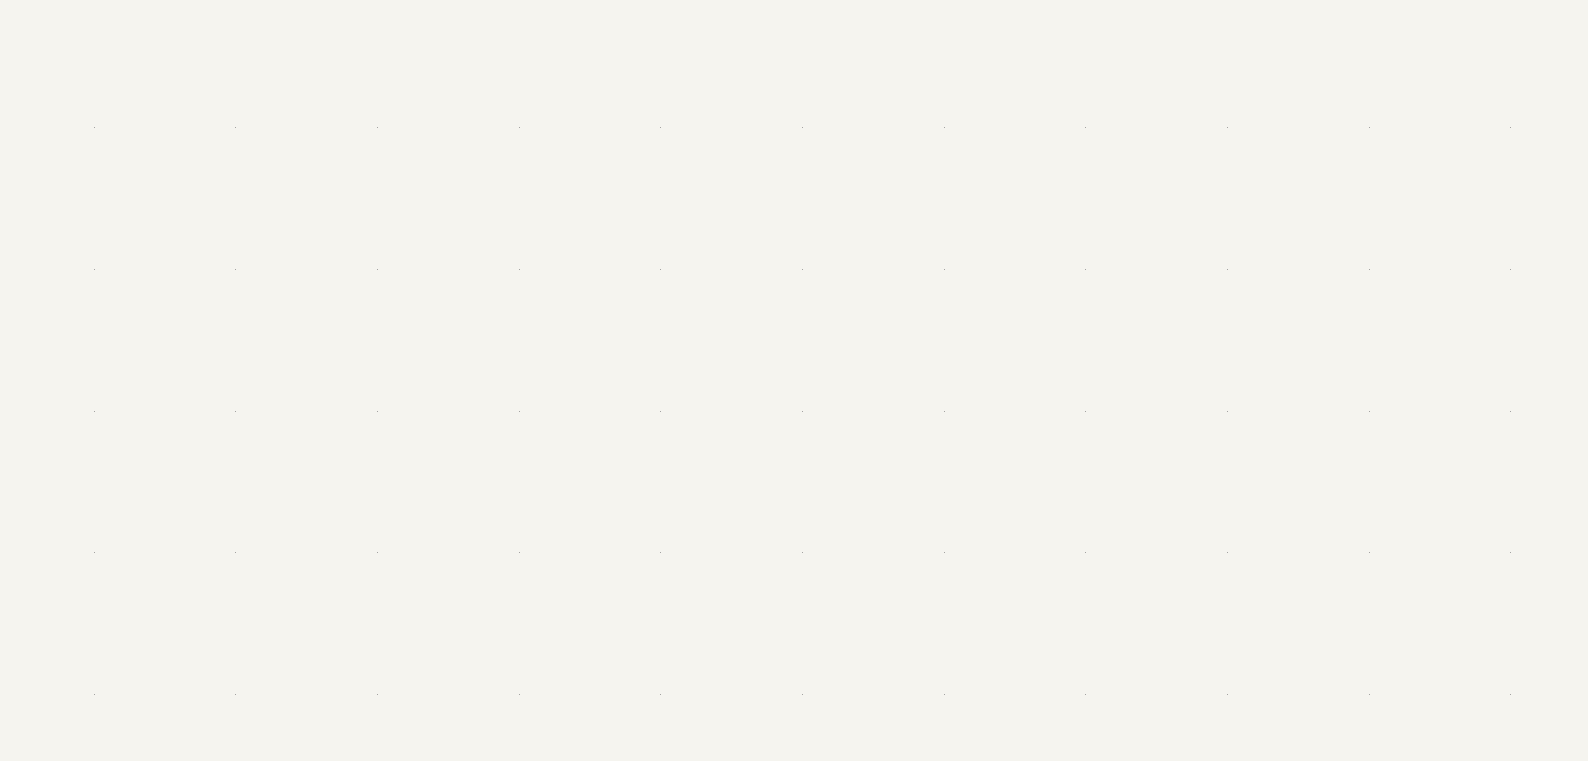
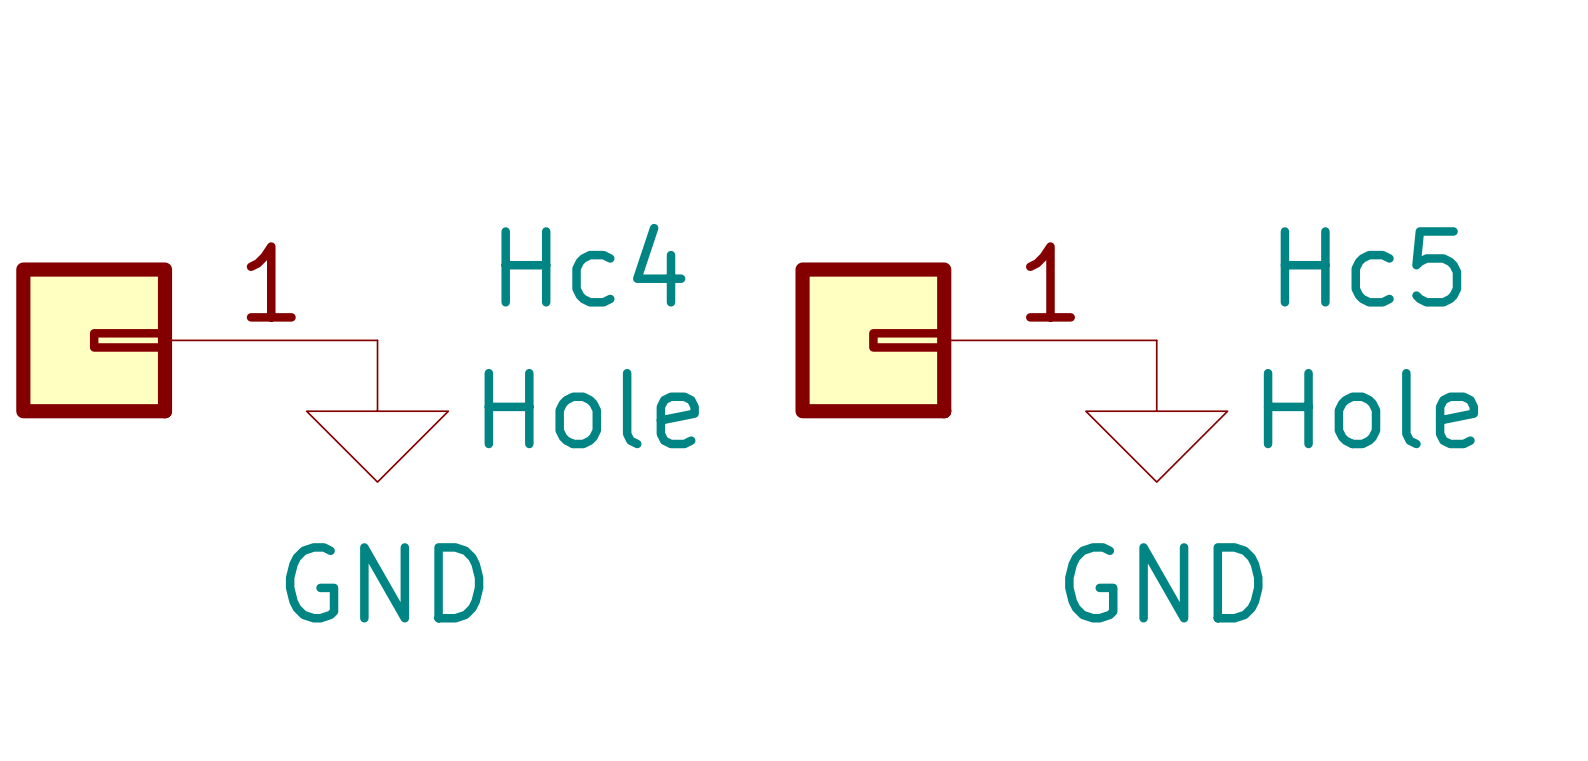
Hc4: none -> Hole (196, 340)
Hc5: none -> Hole (976, 340)
power symbol: none -> GND (377, 411)
power symbol: none -> GND (1156, 411)

